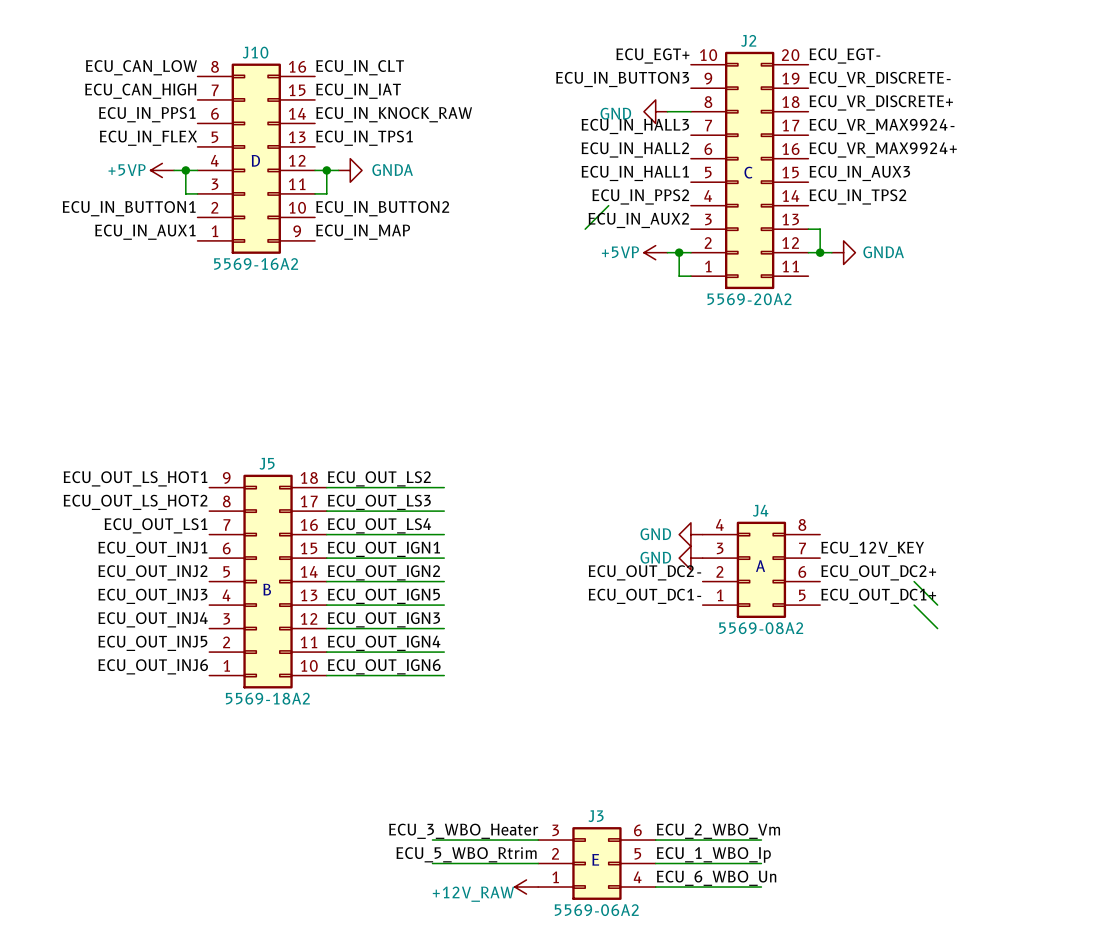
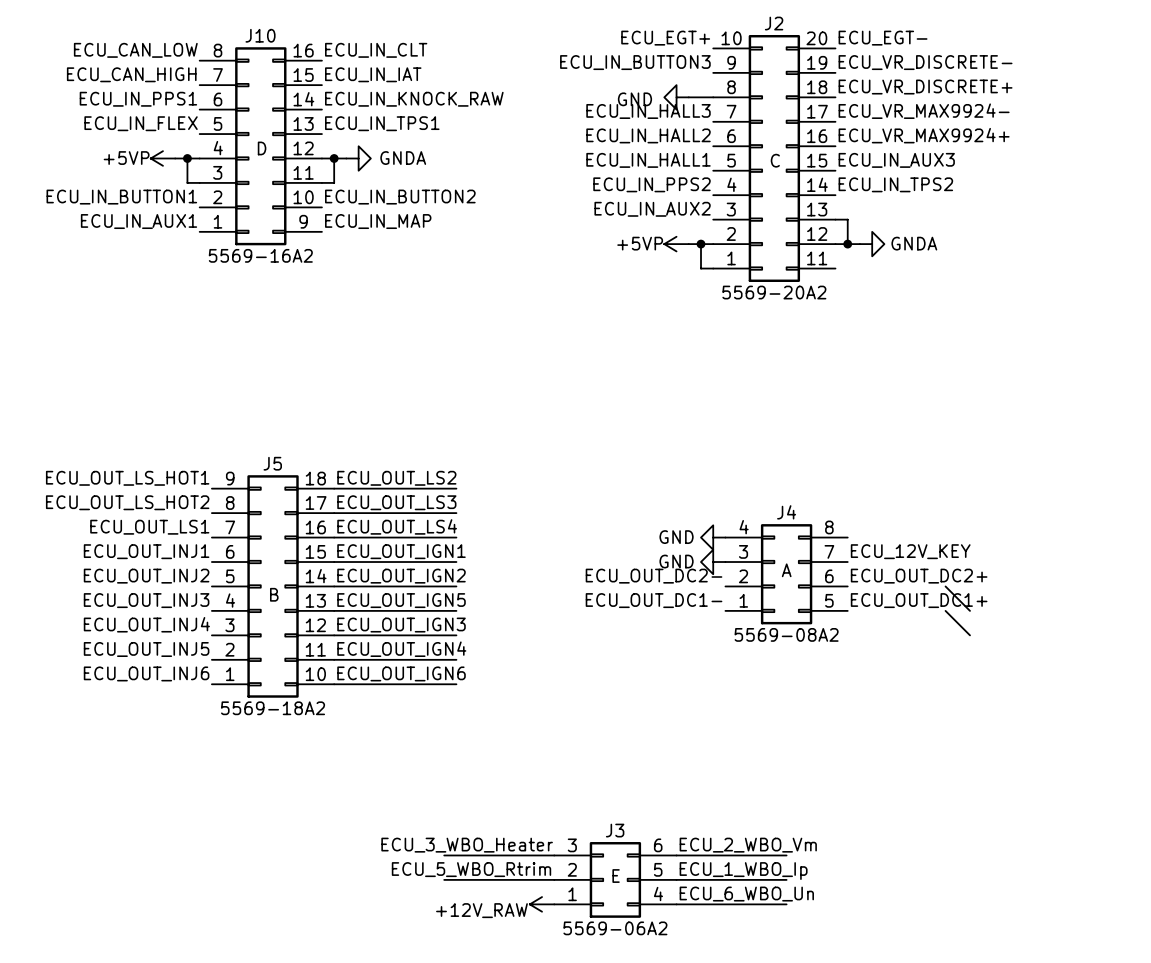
wire: (608, 205) (585, 229) -> none

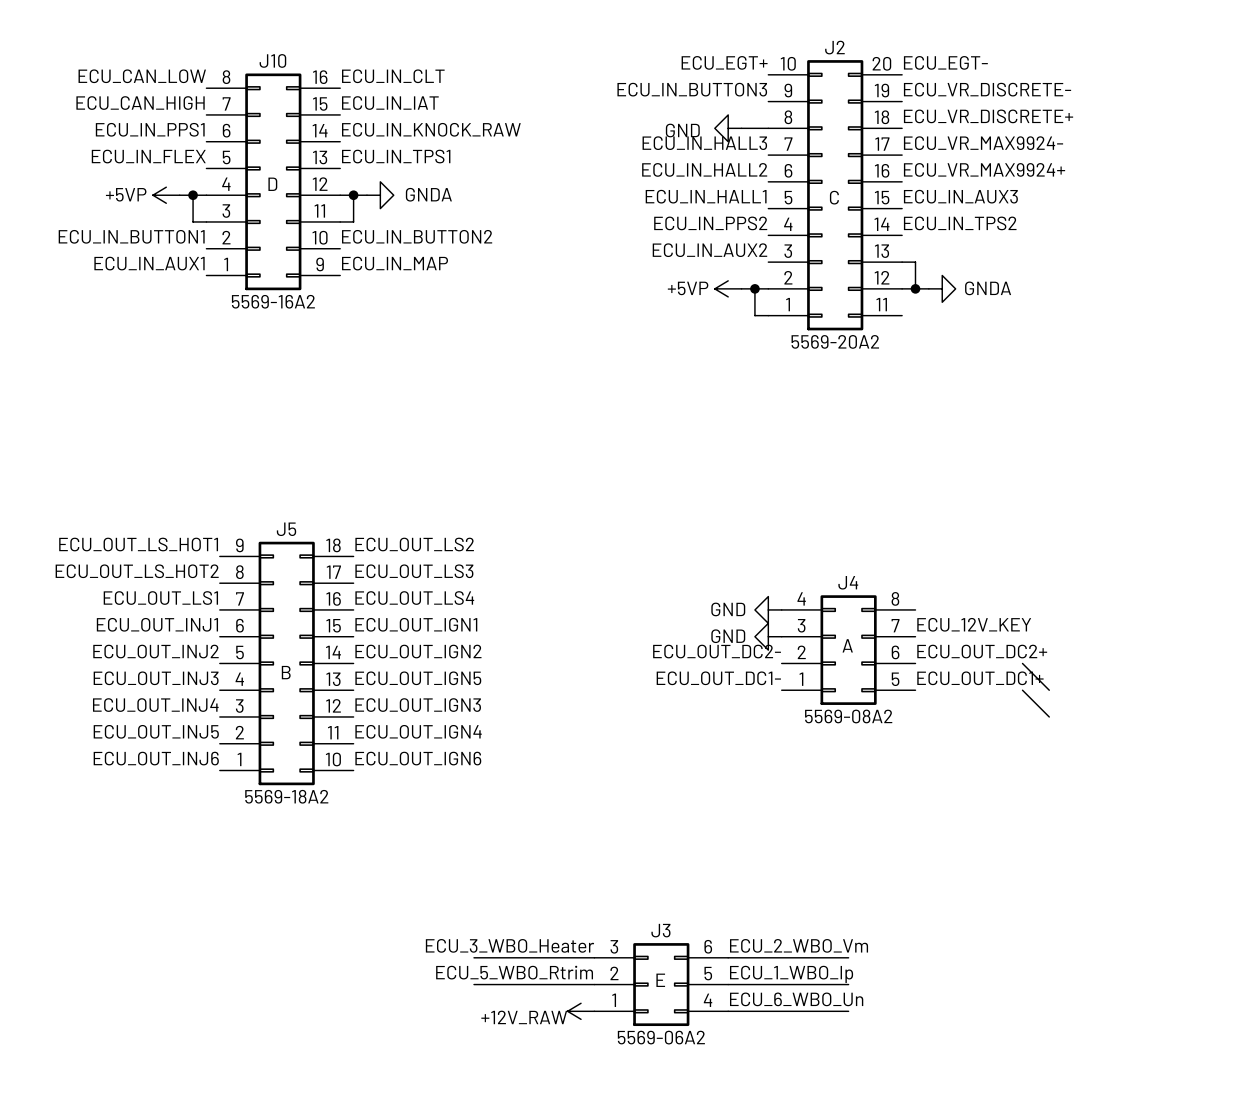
wire: (334, 488) (456, 488) -> none
wire: (334, 513) (456, 513) -> none
wire: (334, 537) (456, 537) -> none
wire: (334, 562) (456, 562) -> none
wire: (334, 586) (456, 586) -> none
wire: (334, 610) (456, 610) -> none
wire: (334, 635) (456, 635) -> none
wire: (334, 659) (456, 659) -> none
wire: (334, 684) (456, 684) -> none

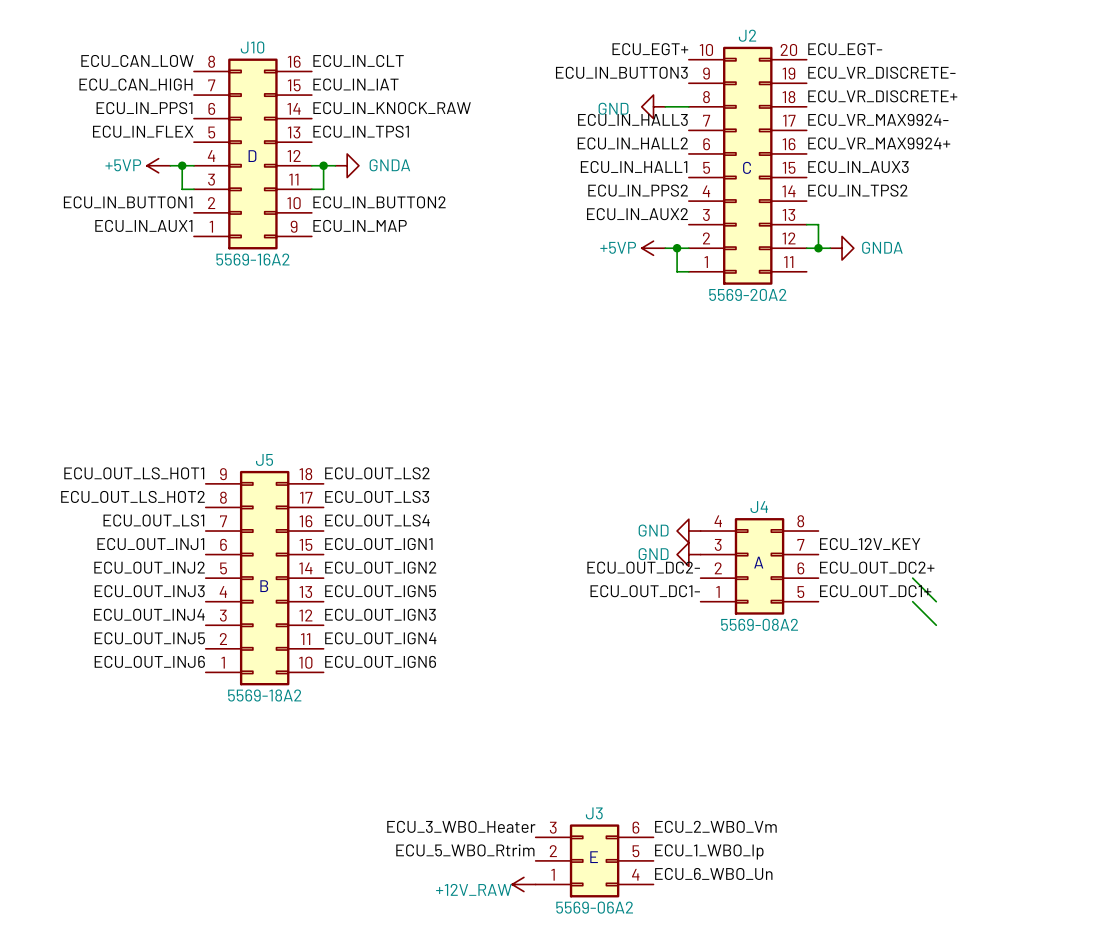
wire: (474, 957) (594, 957) -> none
wire: (728, 957) (848, 957) -> none
wire: (474, 984) (594, 984) -> none
wire: (728, 984) (848, 984) -> none
wire: (728, 1011) (848, 1011) -> none

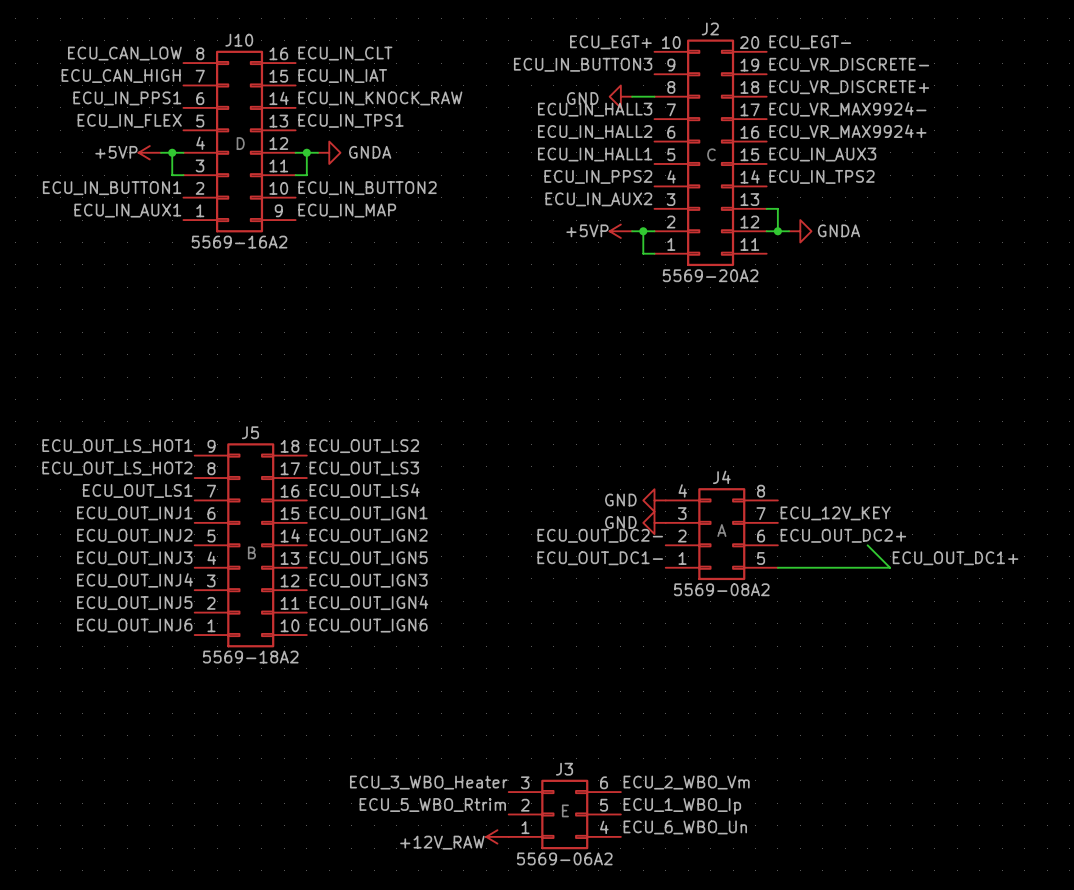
label position: ECU_OUT_DC1+ (875, 591) -> ECU_OUT_DC1+ (955, 558)
wire: none -> (777, 567) (890, 567)
wire: (912, 601) (936, 625) -> none

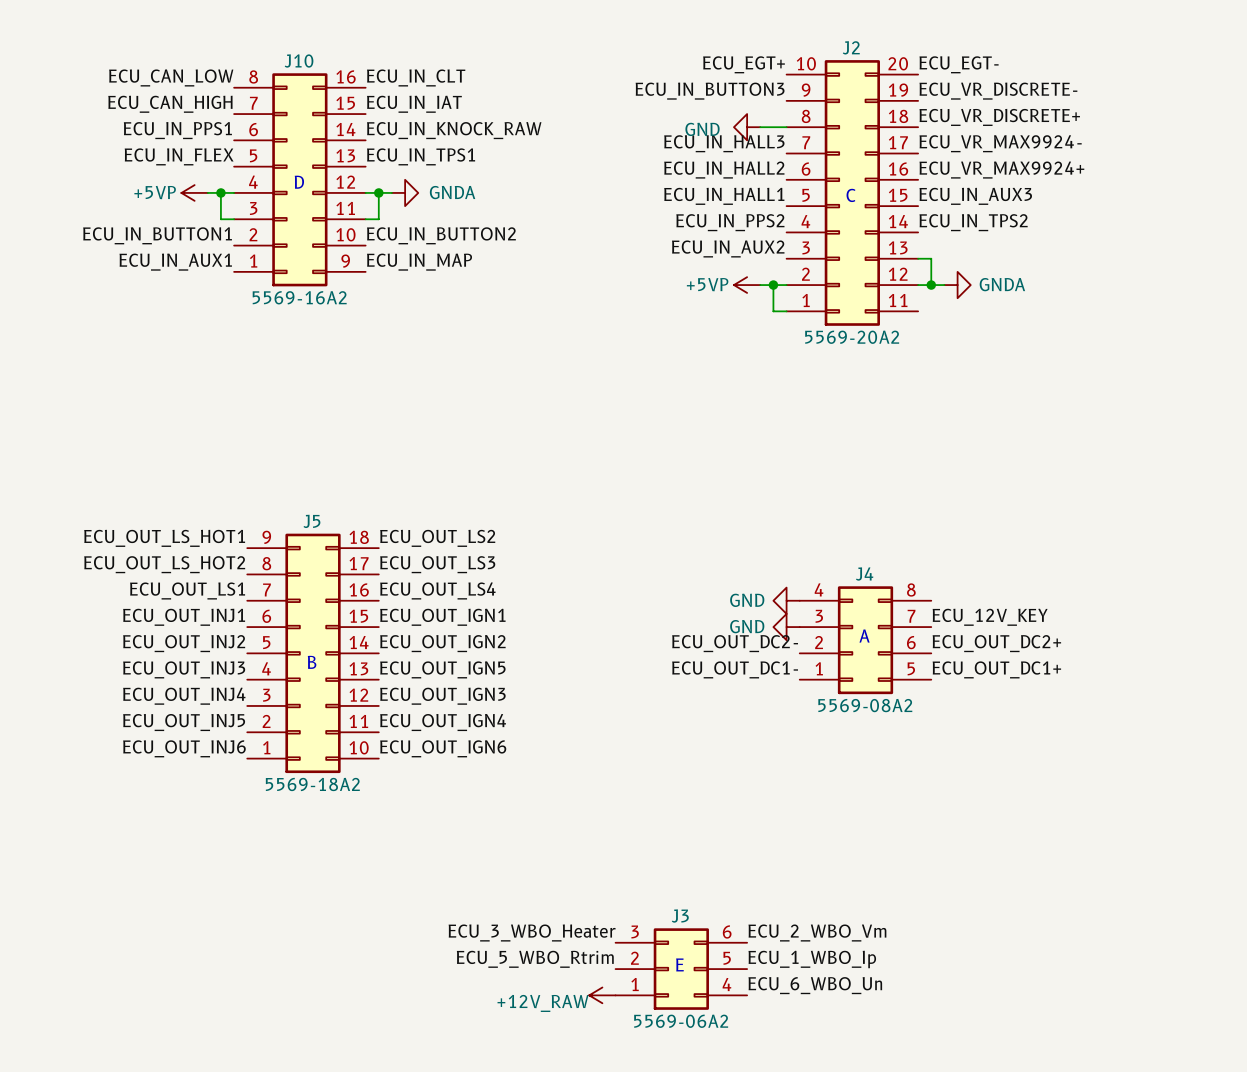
wire: (867, 545) (890, 567) (777, 567) -> none
label position: ECU_OUT_DC1+ (955, 558) -> ECU_OUT_DC1+ (996, 669)

